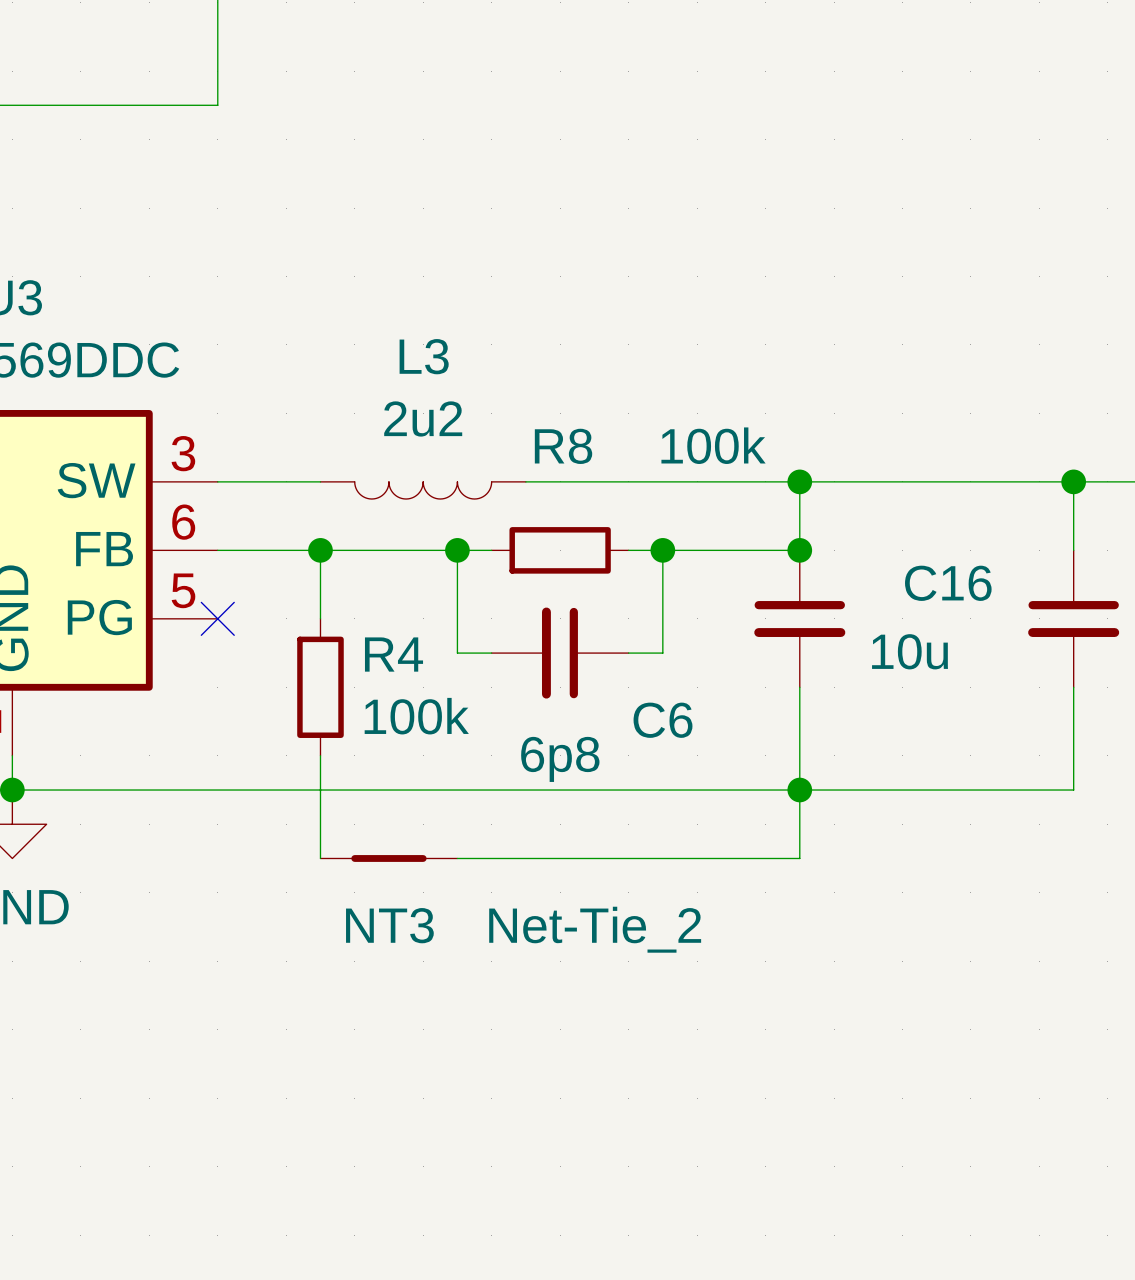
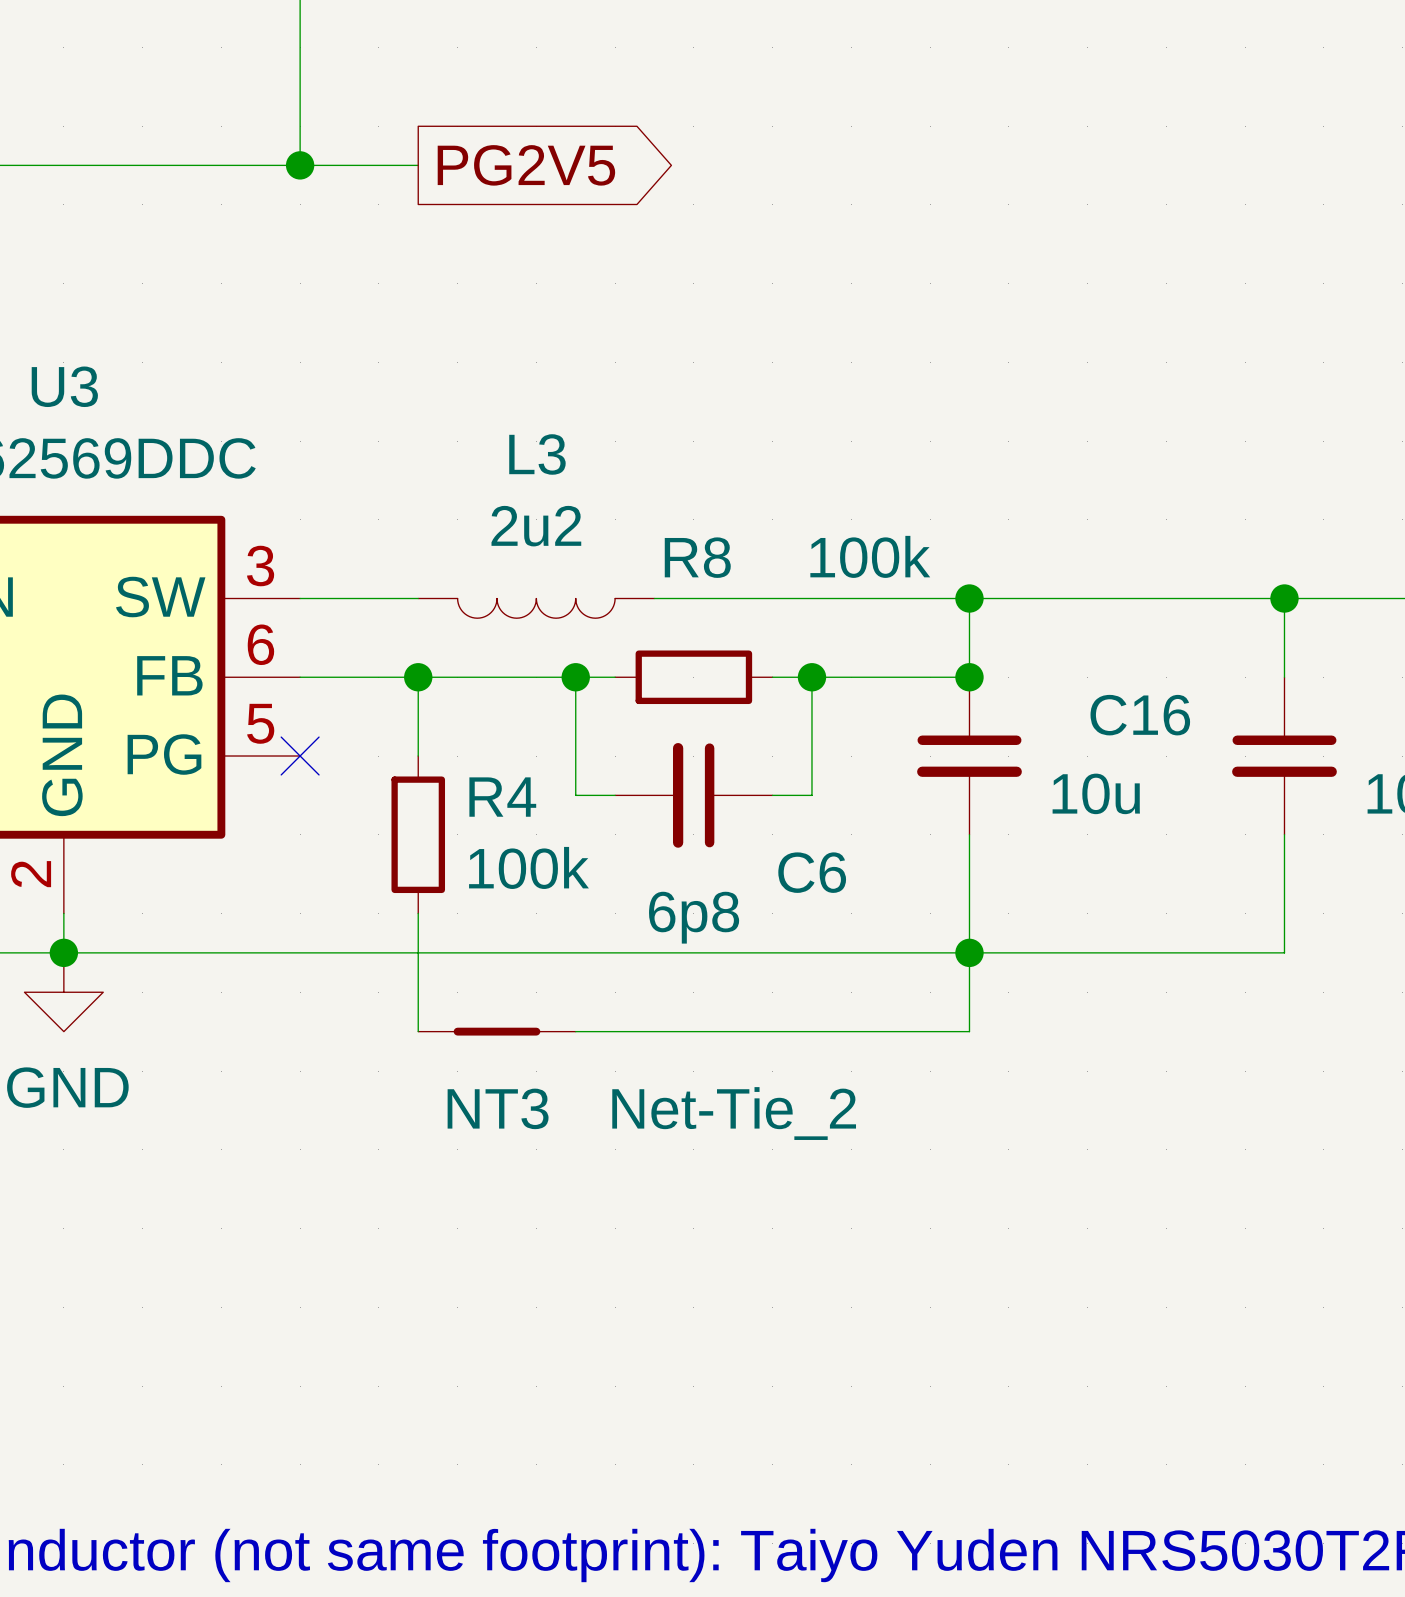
wire: none -> (300, 165) (418, 165)
junction: none -> (300, 165)
global label: none -> PG2V5 (526, 165)

